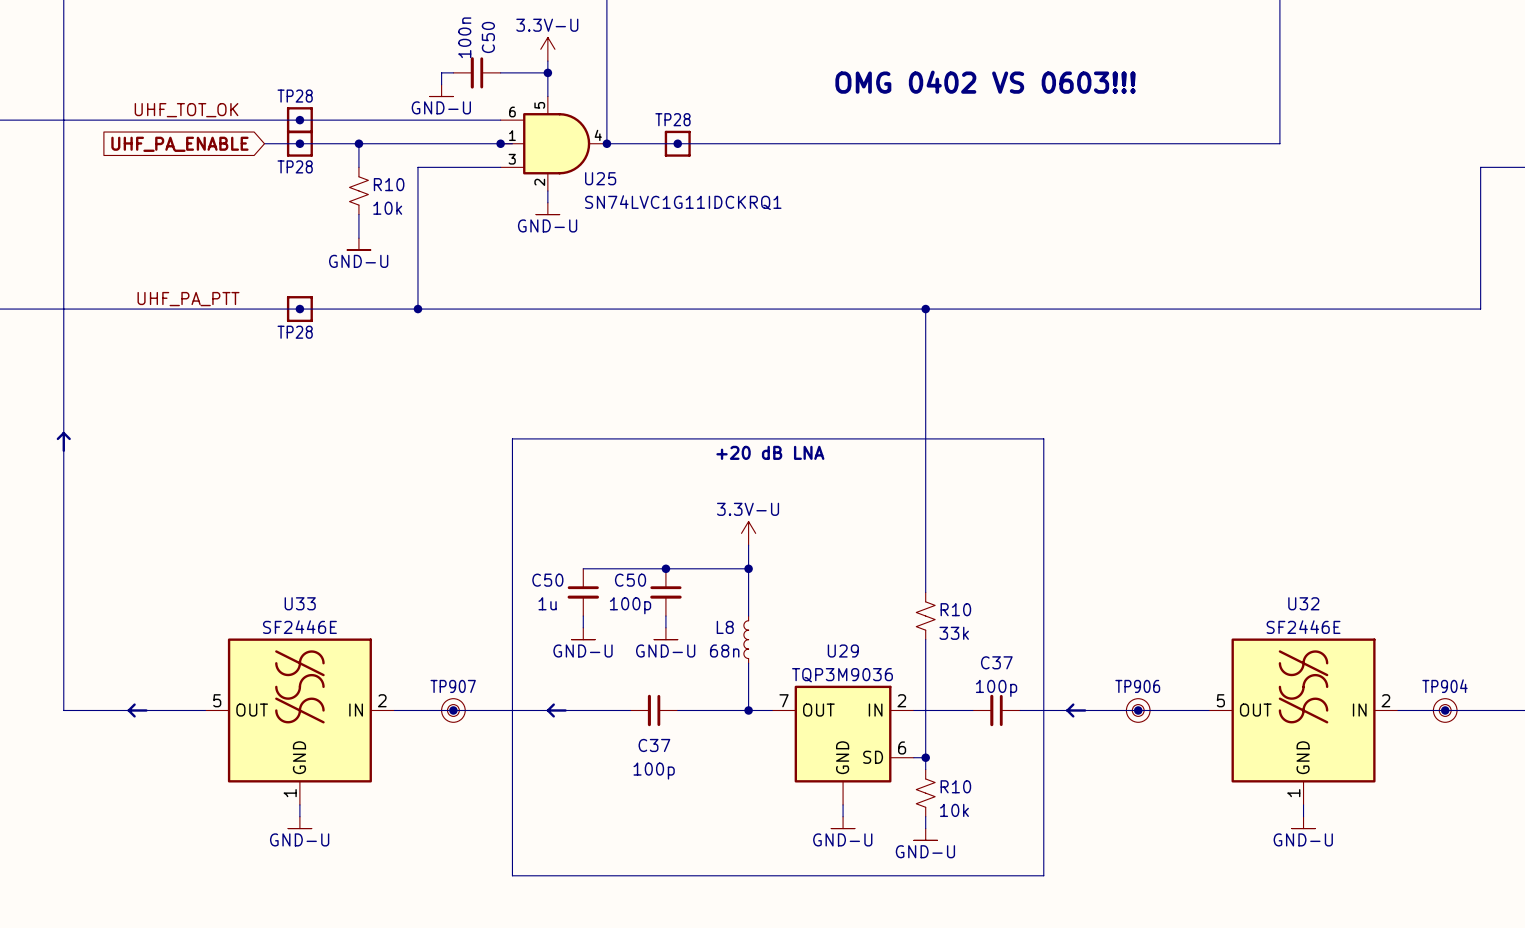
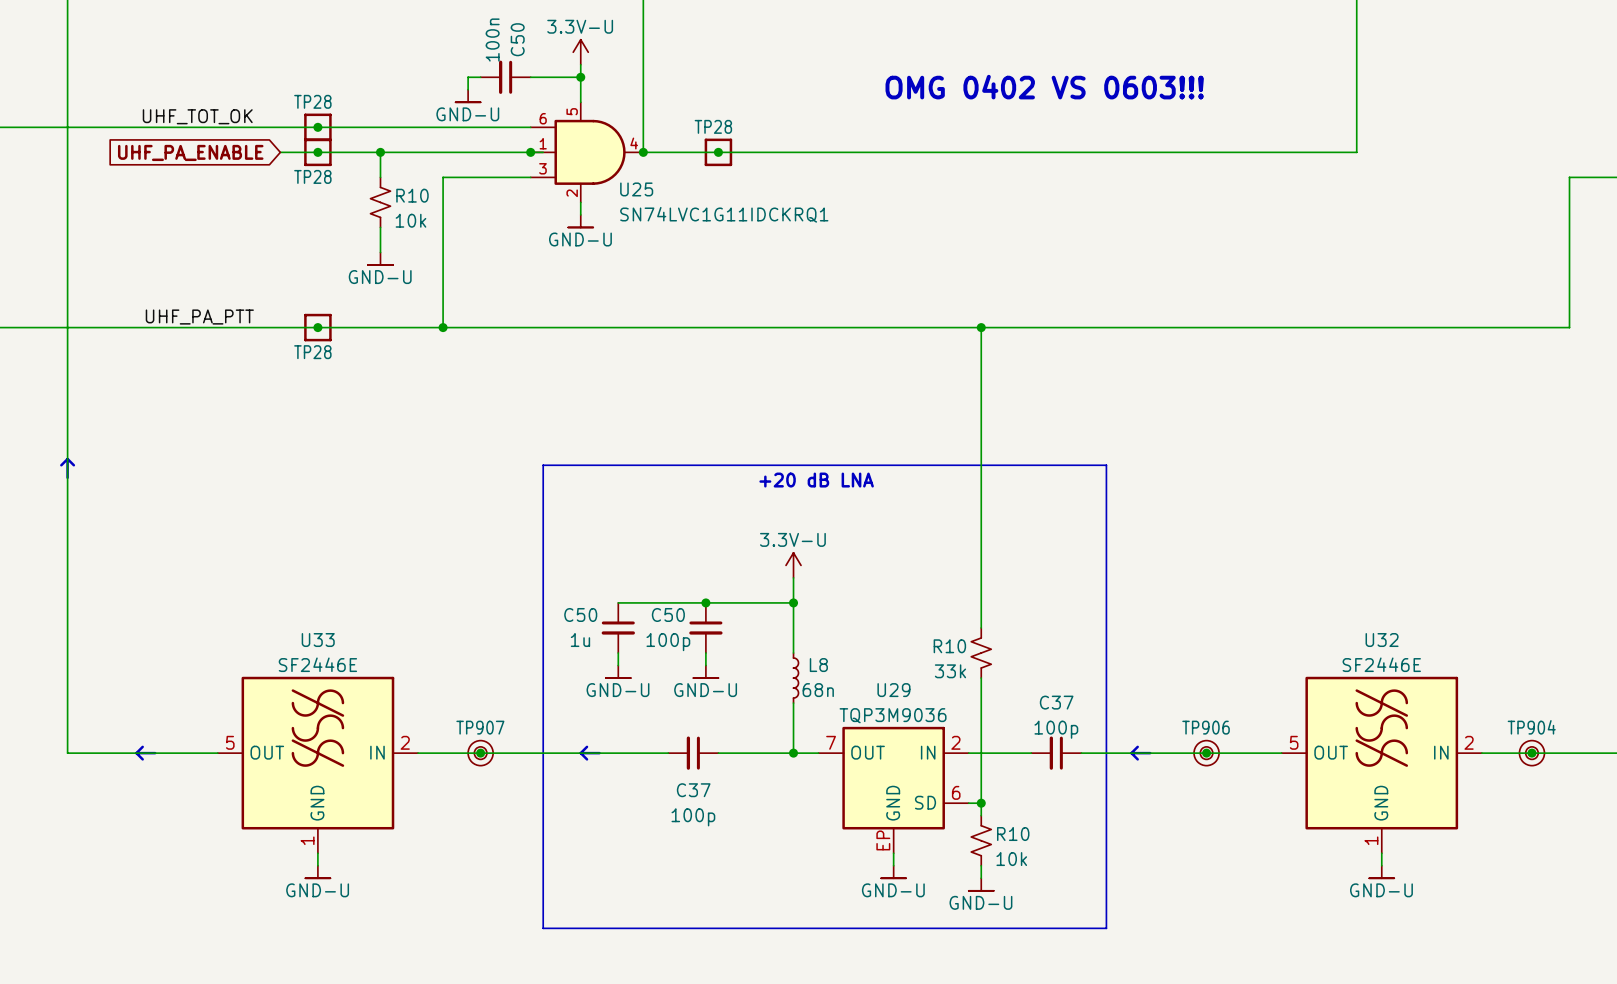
R10 flip: as is (925, 616) -> left-right (981, 653)
L8 name position: L8 (725, 627) -> L8 (818, 665)
L8 rotation: 0° (746, 639) -> 180° (796, 678)
L8 value position: 68n (724, 651) -> 68n (818, 690)
U29 pin number: none -> EP (883, 840)

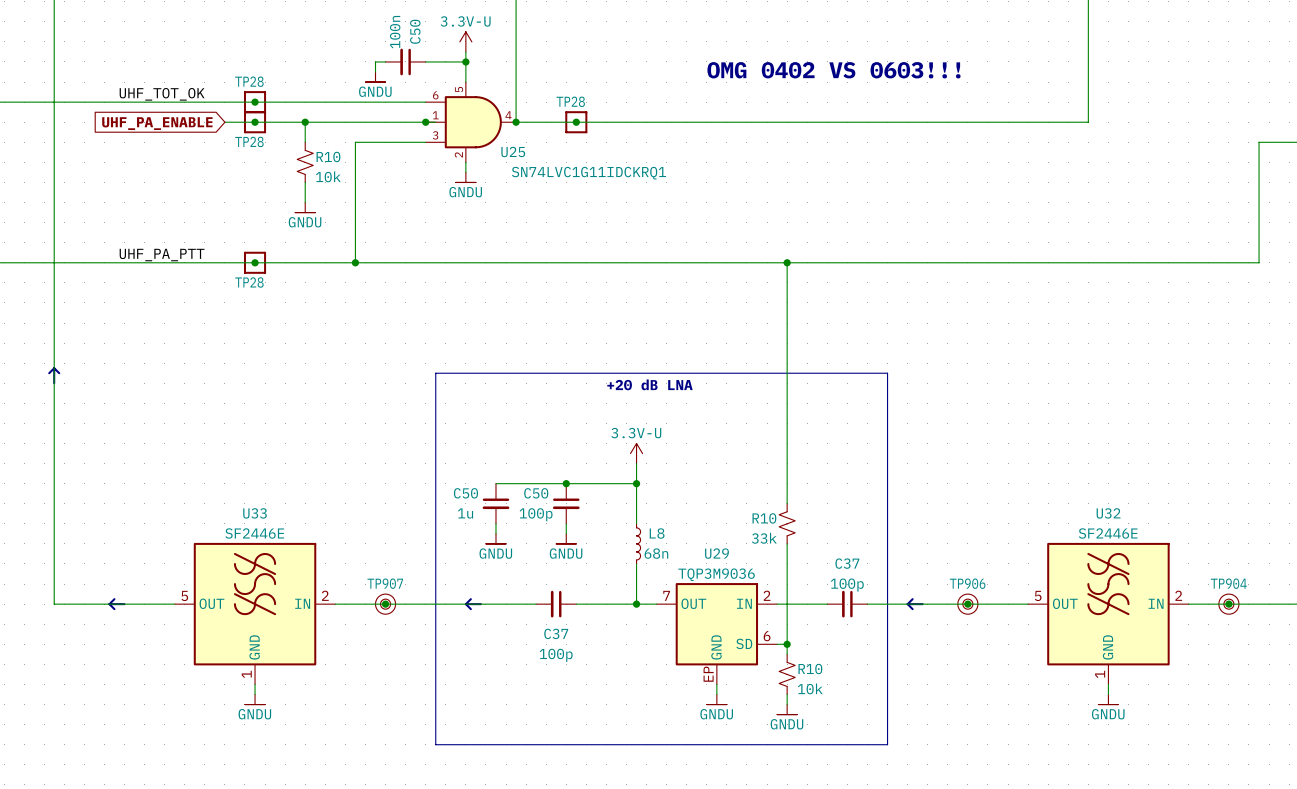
power symbol: GND-U (468, 96) -> GNDU (375, 77)
power symbol: GND-U (580, 221) -> GNDU (465, 177)
power symbol: GND-U (380, 258) -> GNDU (305, 207)
power symbol: GND-U (618, 671) -> GNDU (495, 538)
power symbol: GND-U (705, 671) -> GNDU (566, 538)
power symbol: GND-U (317, 872) -> GNDU (255, 699)
power symbol: GND-U (893, 872) -> GNDU (716, 699)
power symbol: GND-U (1381, 872) -> GNDU (1108, 699)
power symbol: GND-U (981, 884) -> GNDU (787, 709)

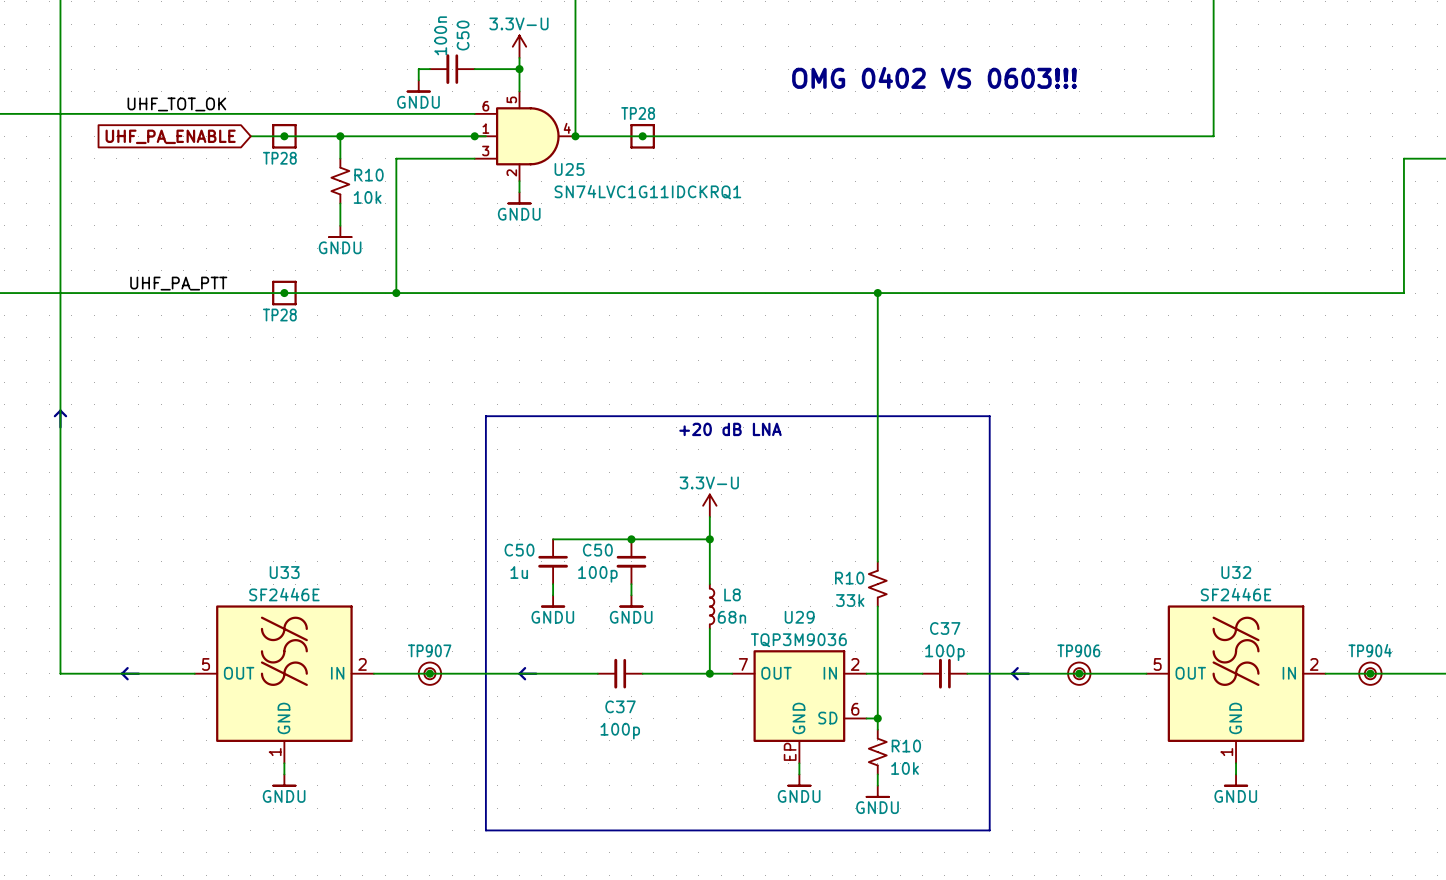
junction: (255, 102) -> none
TP28: (255, 102) -> none

